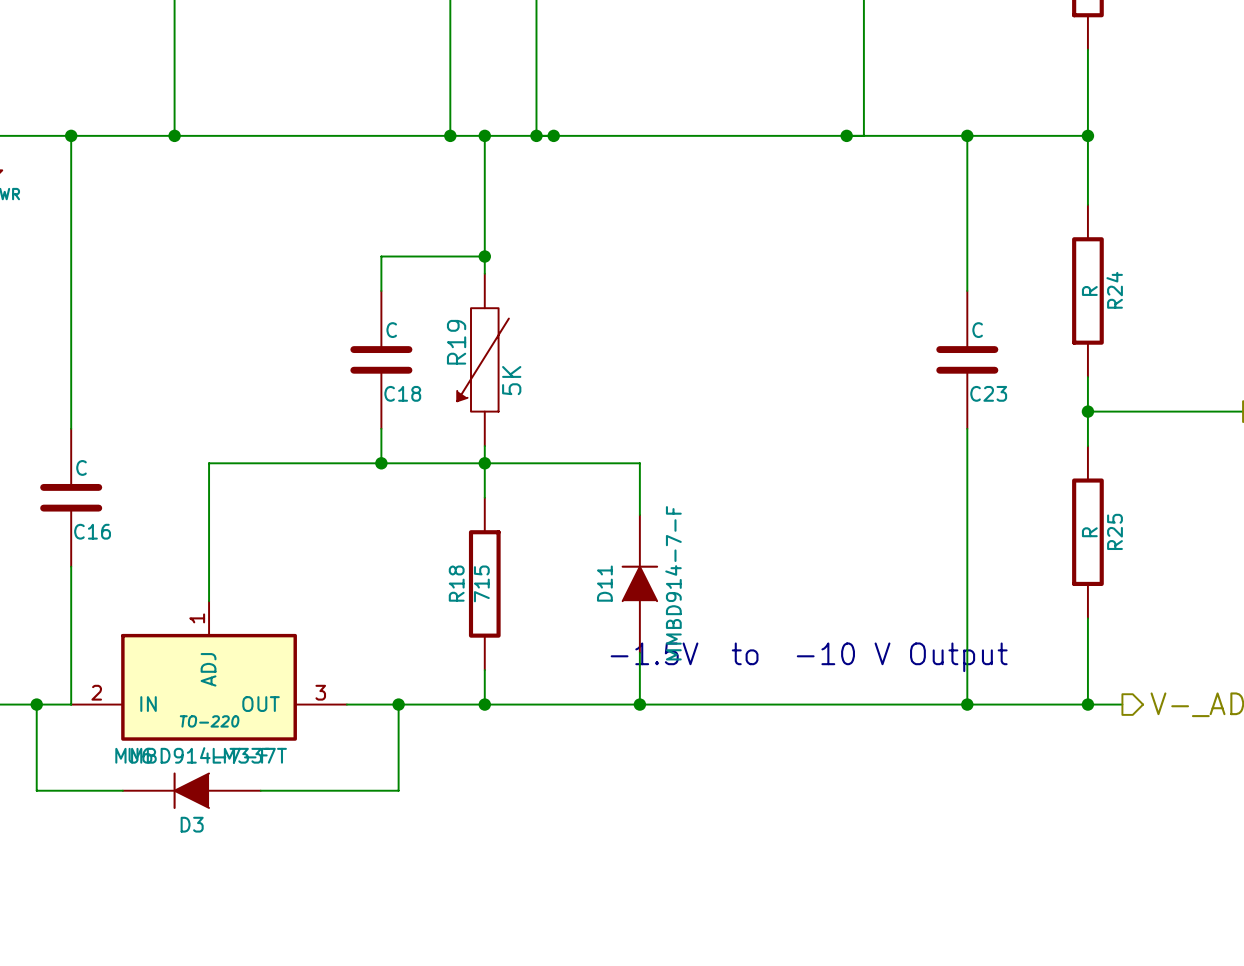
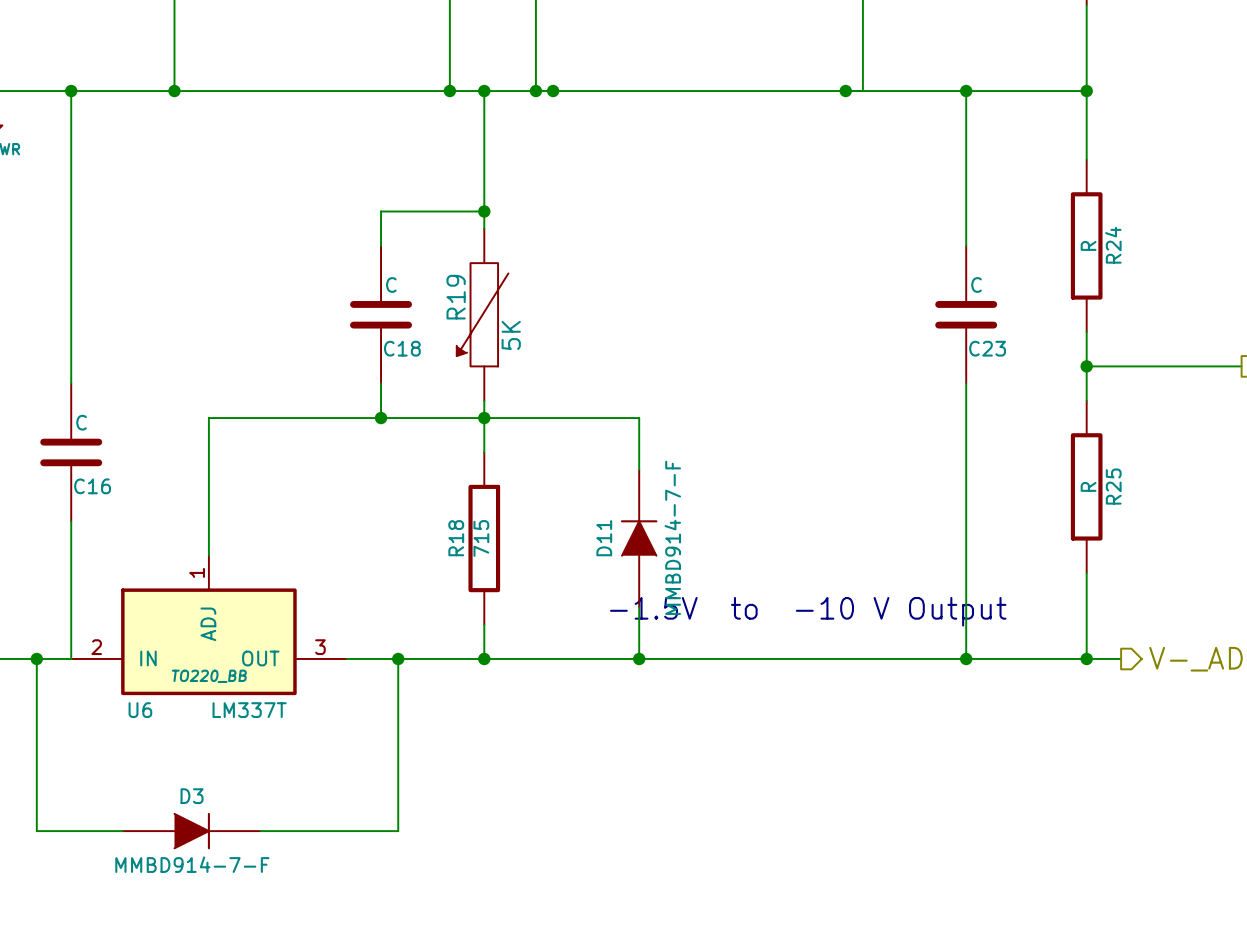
U6 text: TO-220 (209, 721) -> TO220_BB (209, 676)
wire: (36, 790) (122, 790) -> (36, 745) (36, 831) (122, 831)
D3 rotation: 0° (191, 790) -> 180° (192, 831)
D3 position: (191, 790) -> (191, 831)
wire: (260, 790) (398, 790) -> (260, 831) (398, 831) (398, 745)

